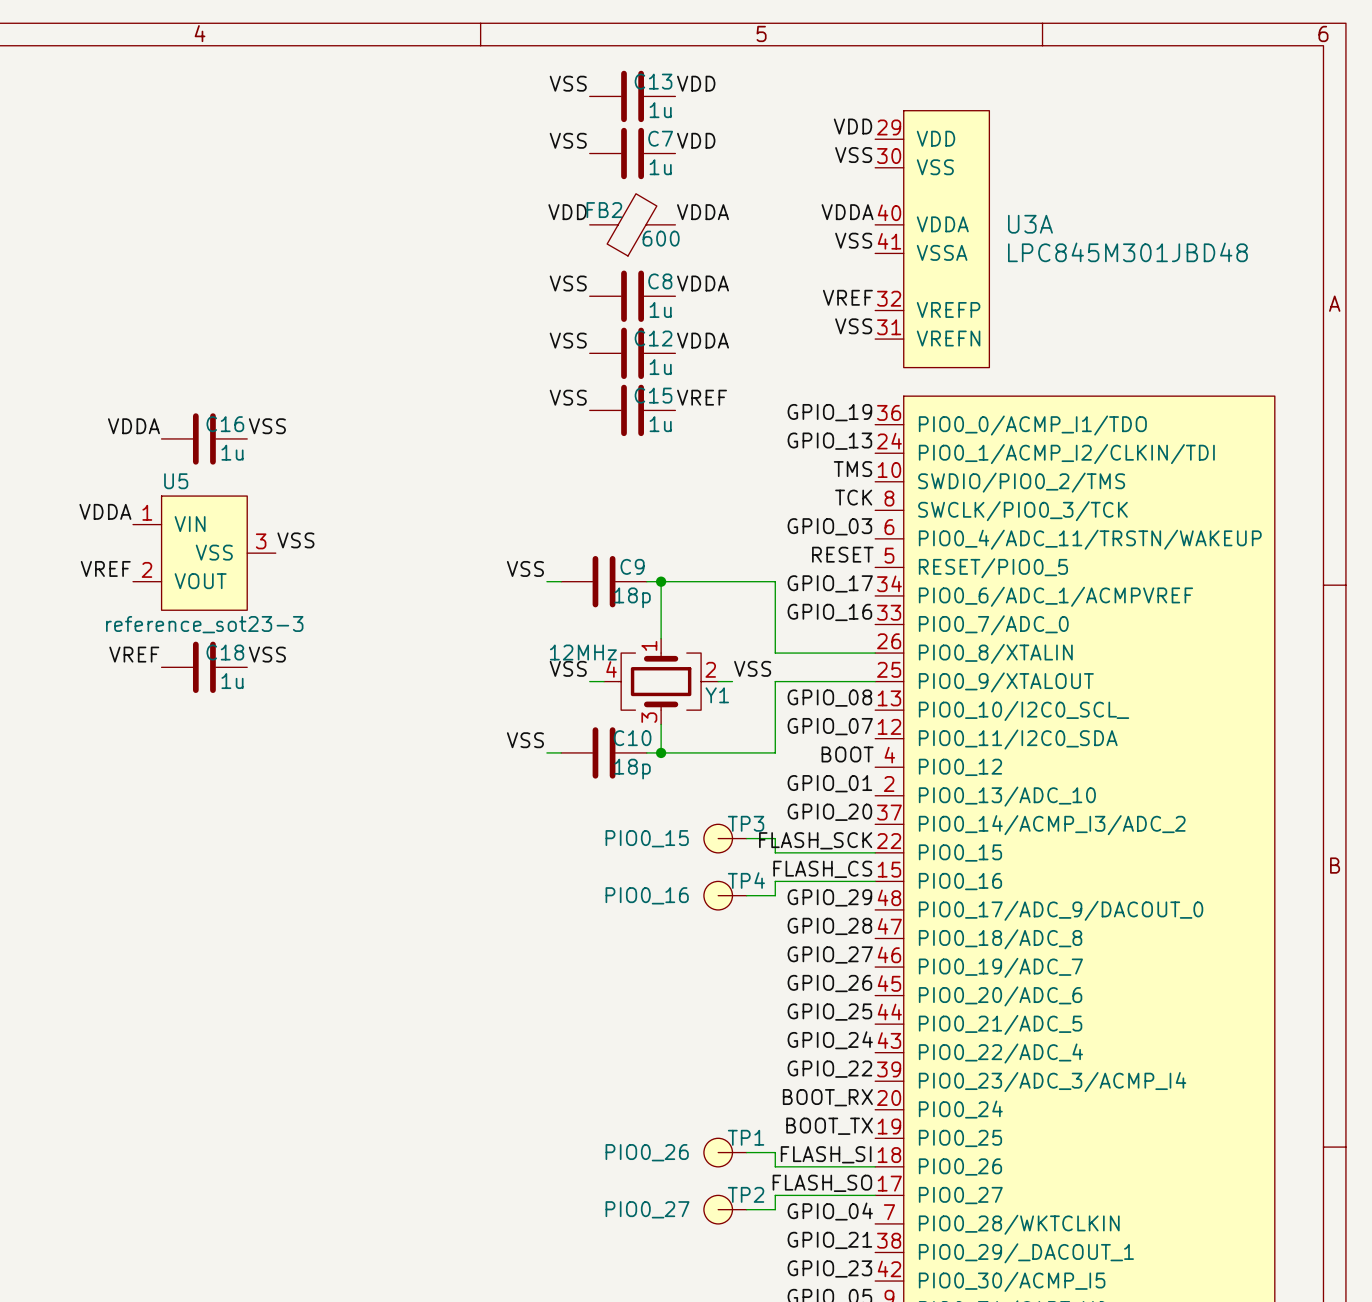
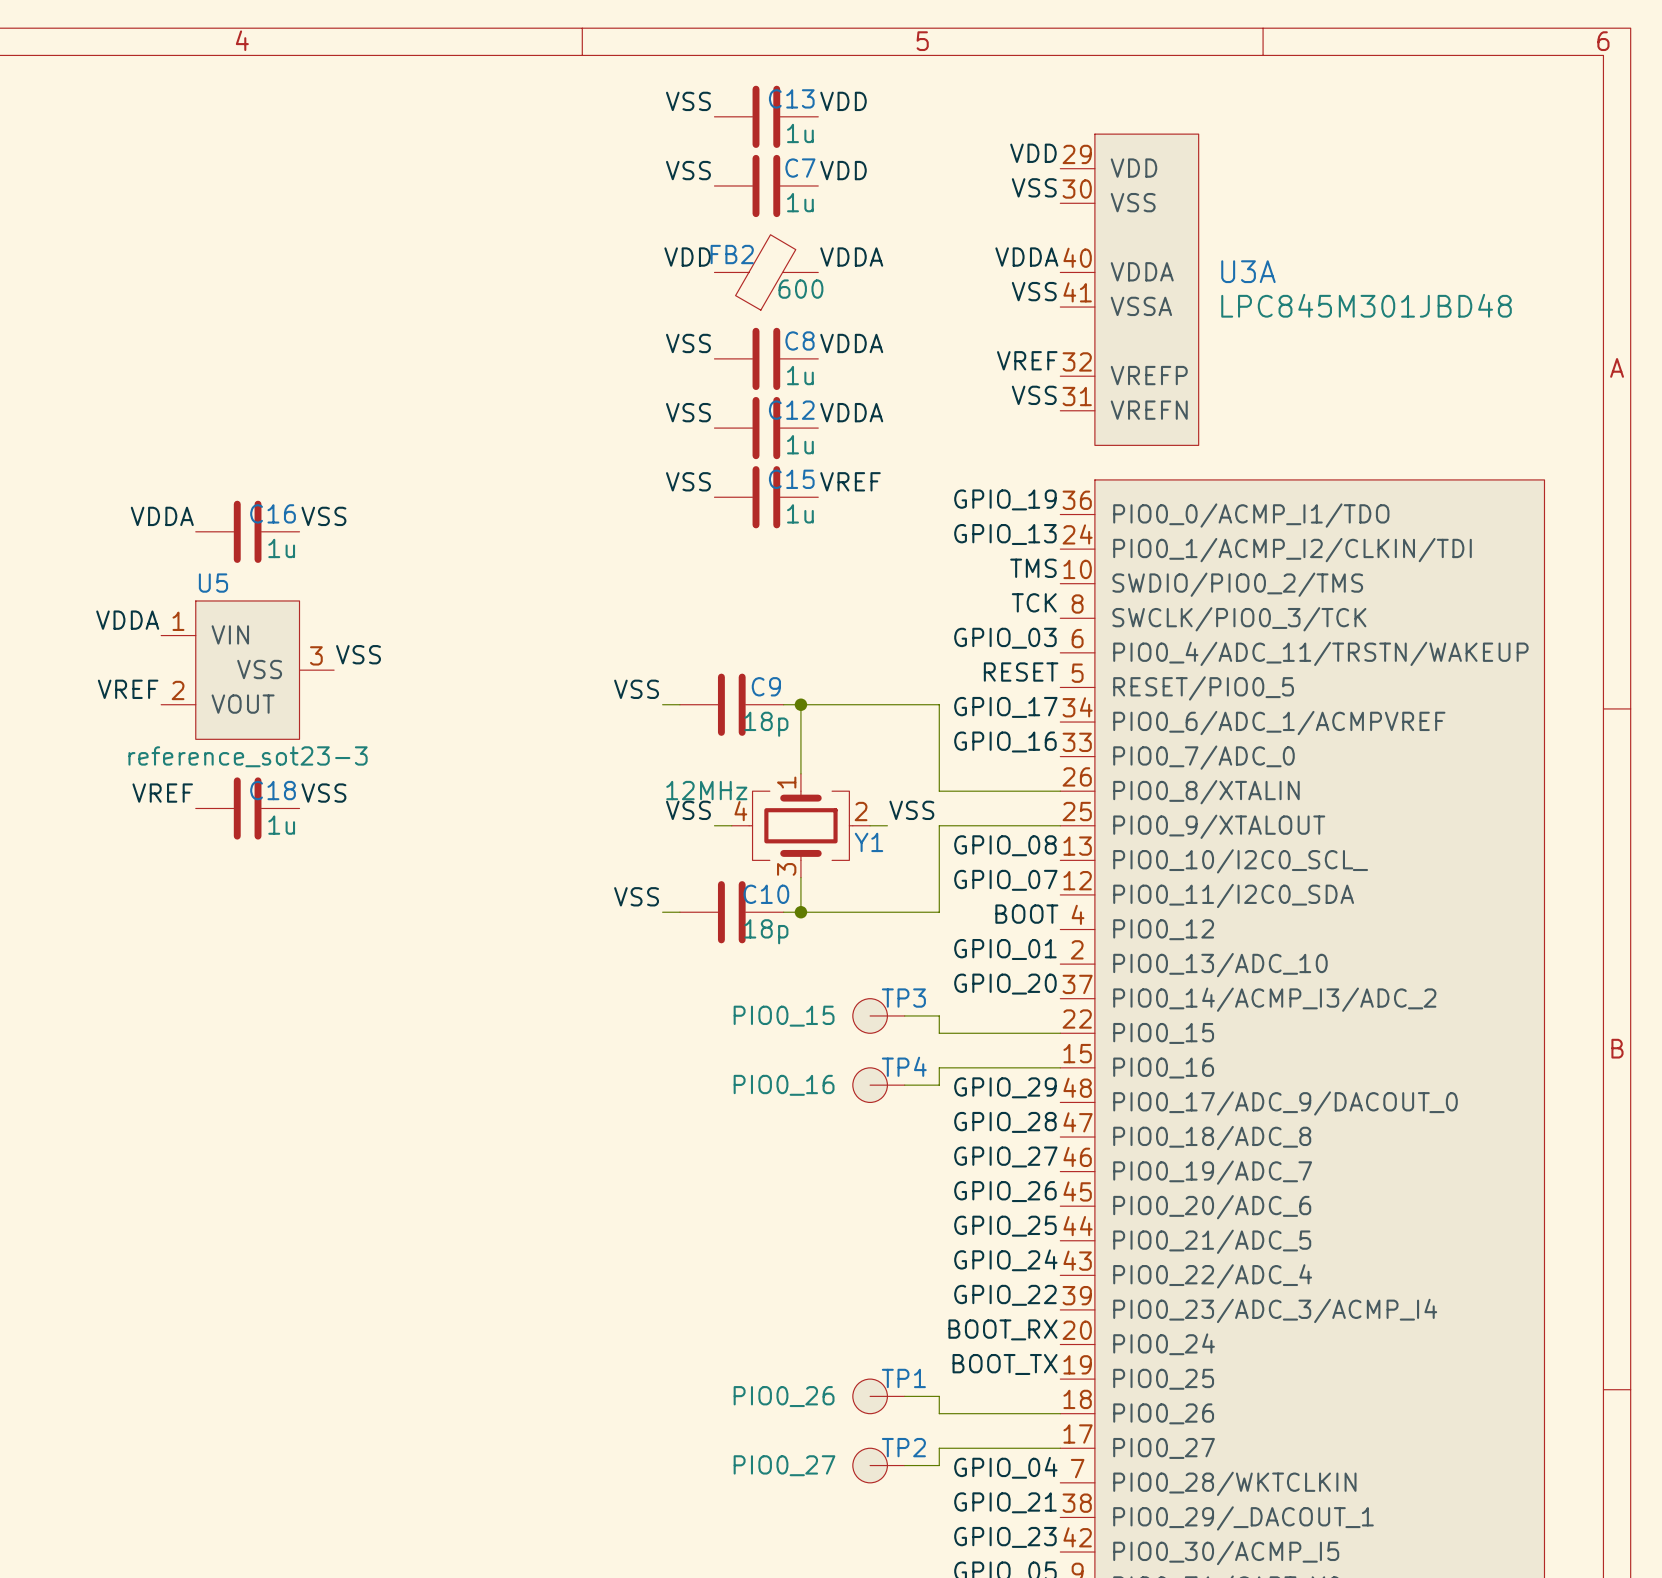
label: FLASH_SCK (815, 840) -> none
label: FLASH_CS (822, 869) -> none
label: FLASH_SI (826, 1154) -> none
label: FLASH_SO (822, 1183) -> none

